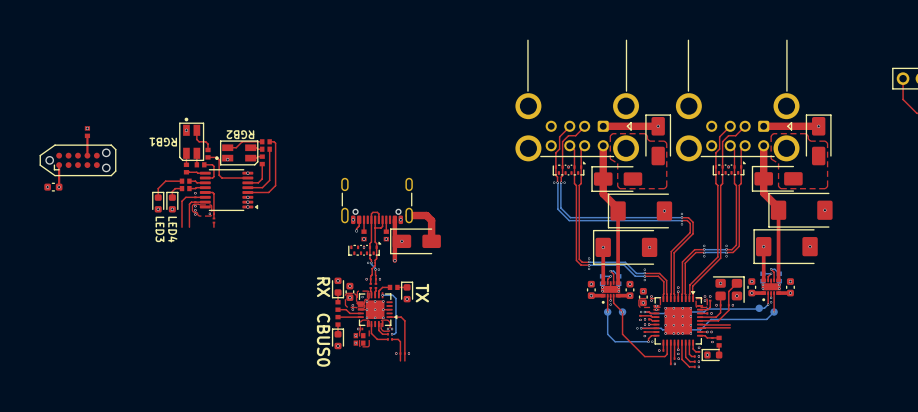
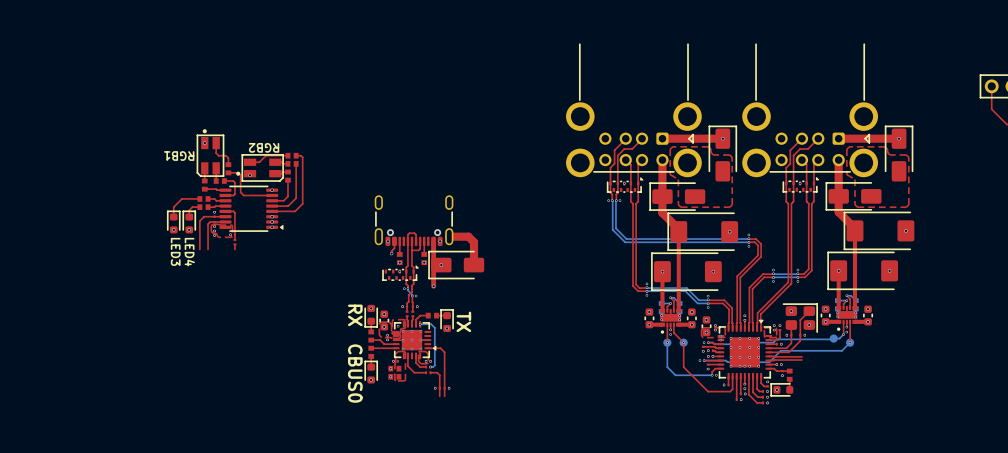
via: (87, 128) -> none
part: (87, 132) -> none
top track: (87, 135) (87, 155) -> none
part: (78, 160) -> none
top track: (59, 165) (59, 187) -> none
via: (47, 187) -> none
part: (53, 187) -> none
via: (59, 187) -> none

